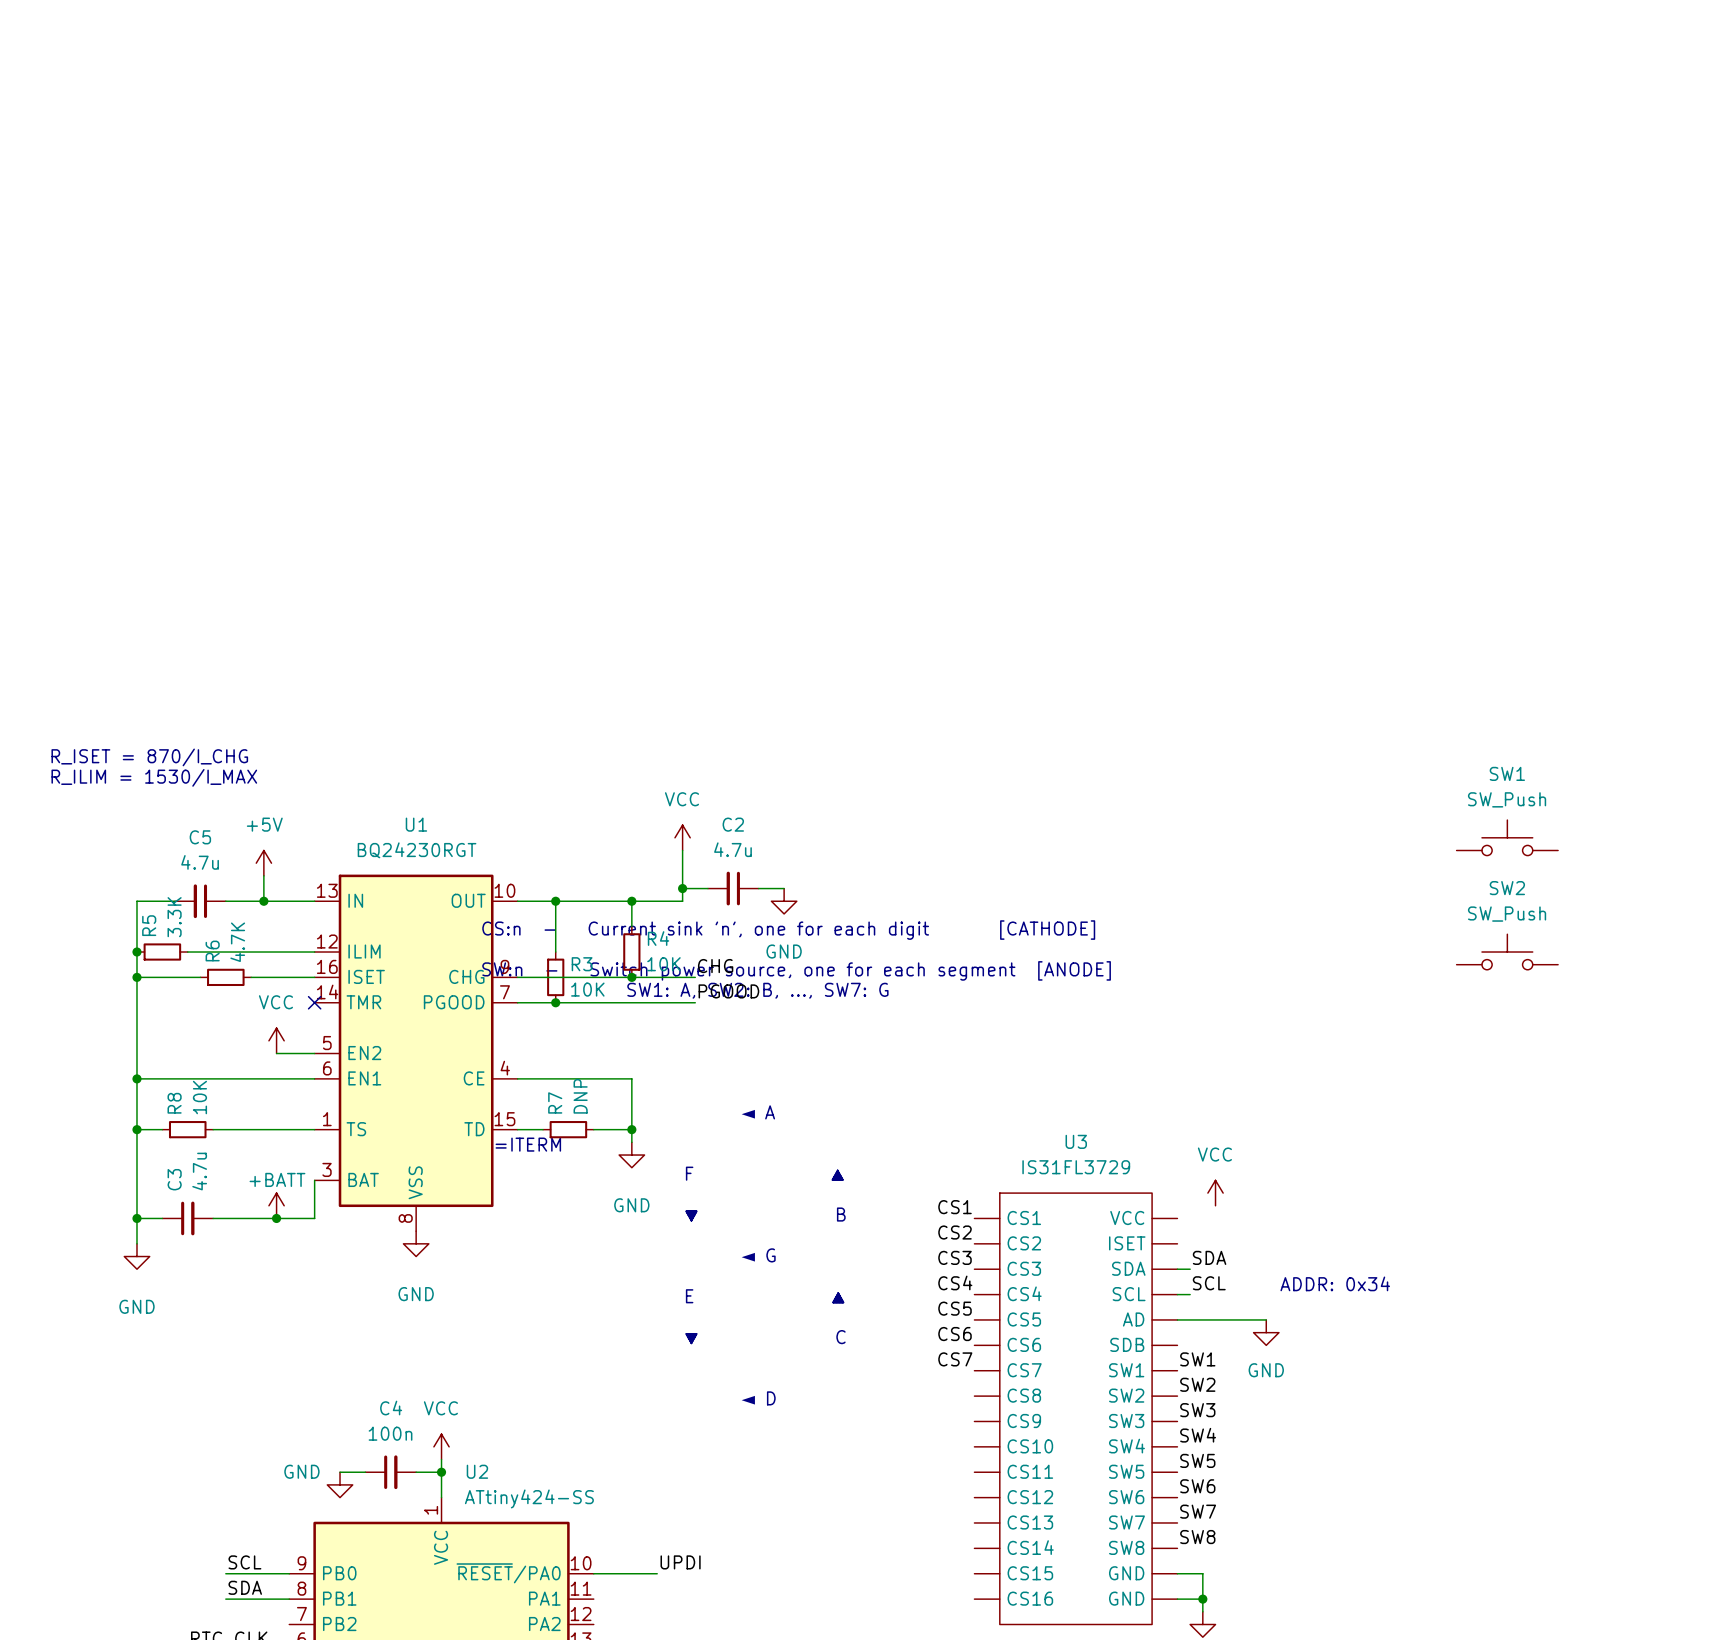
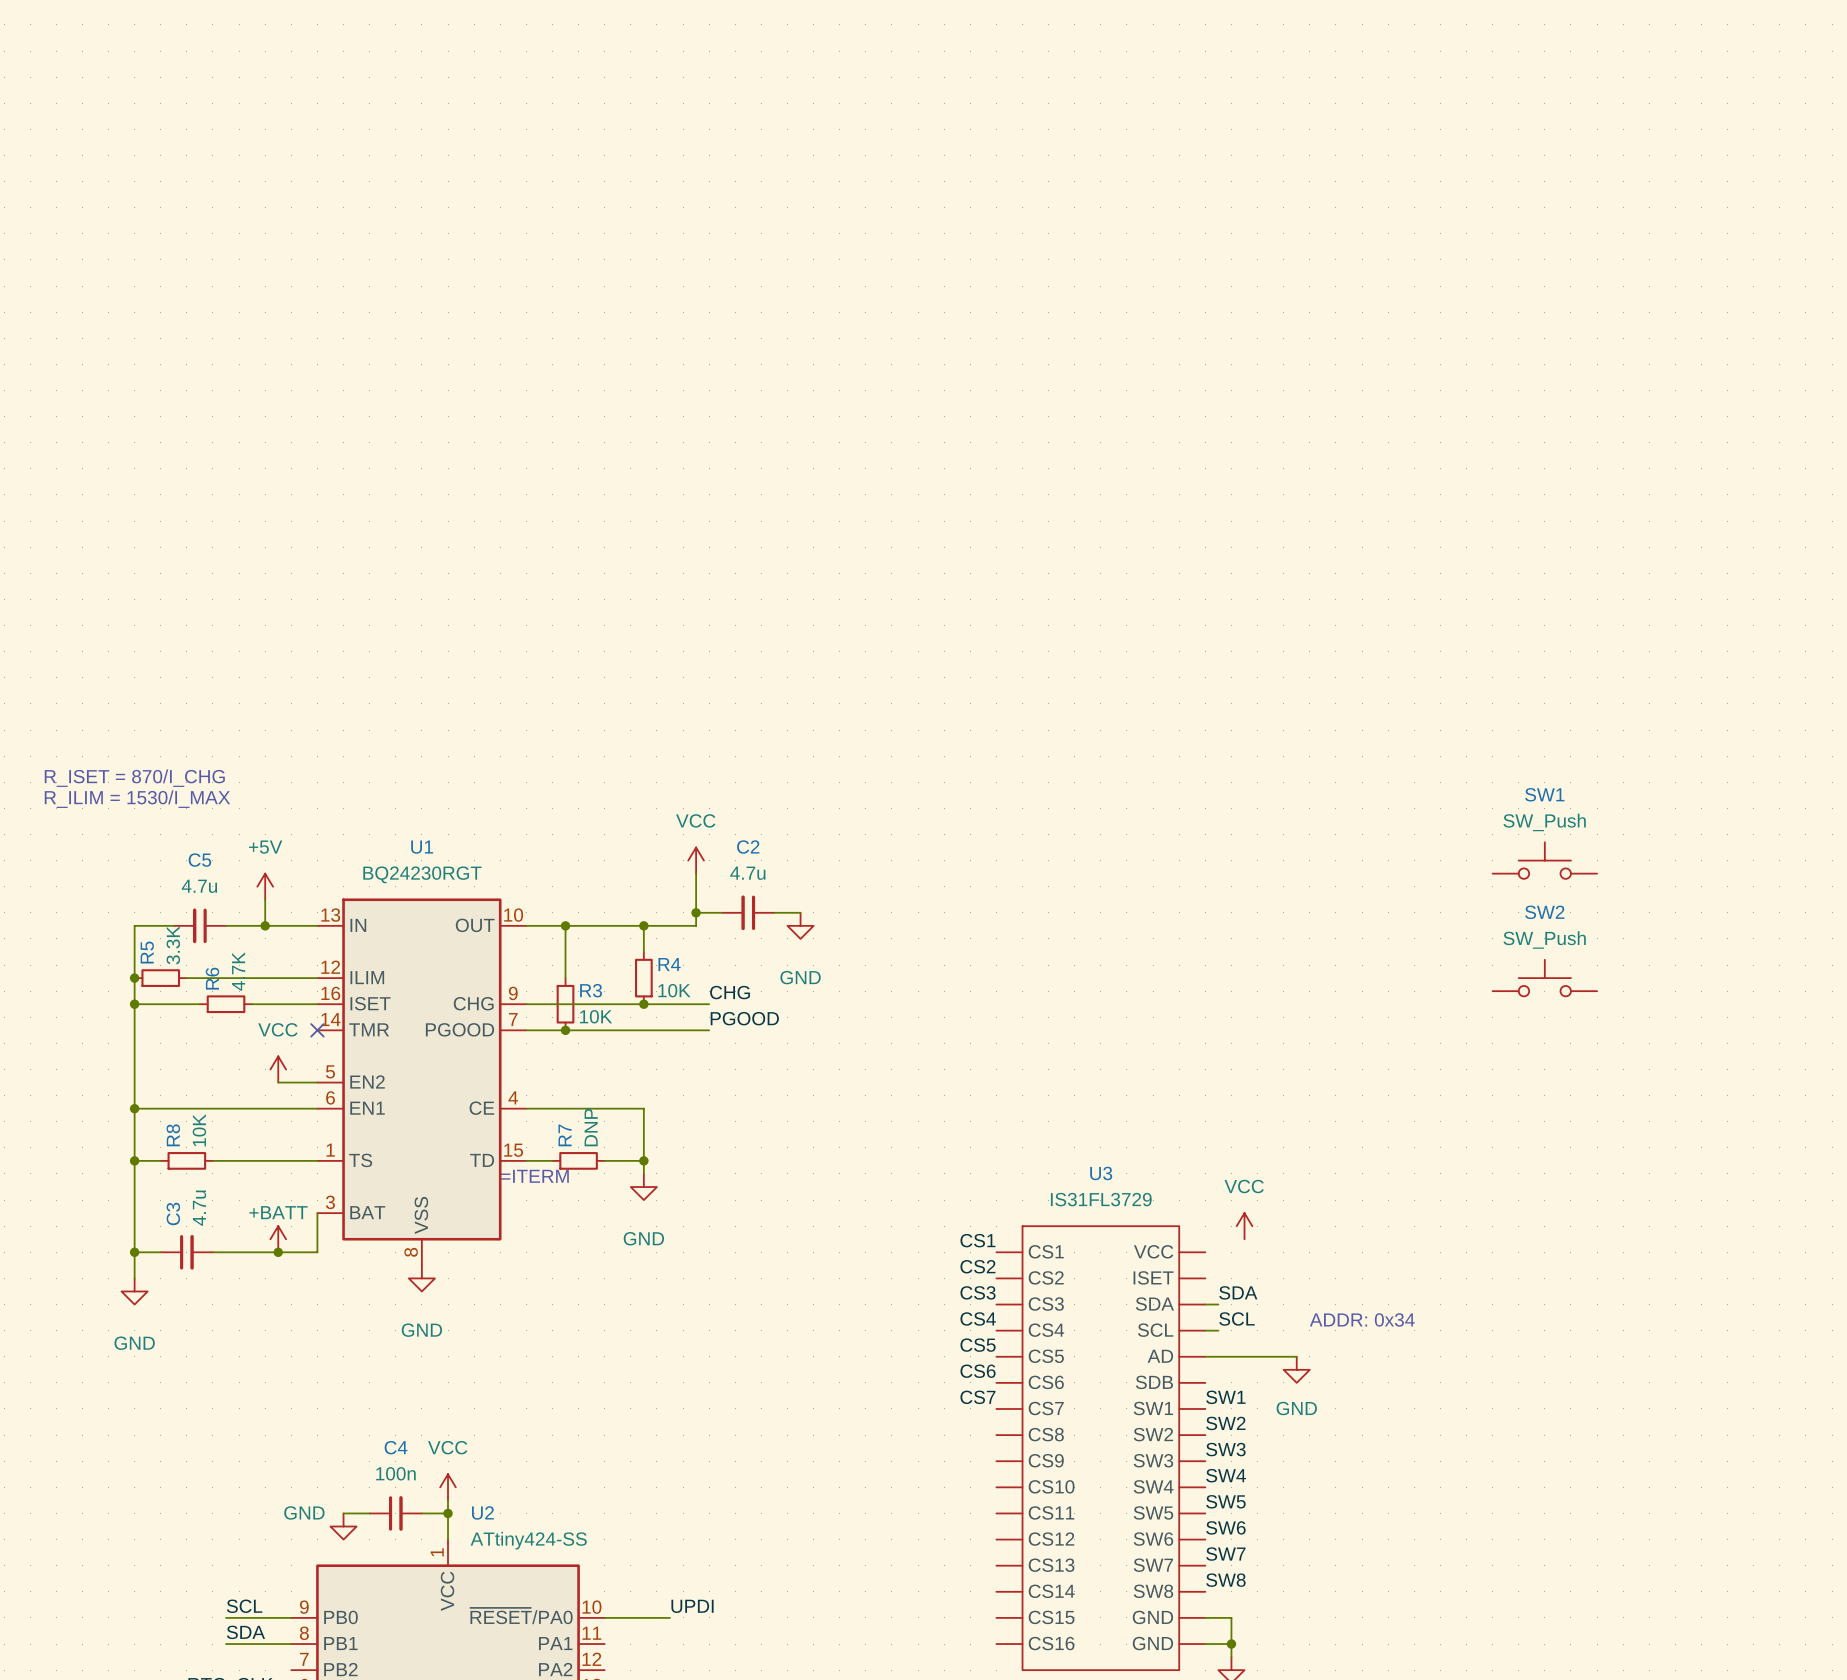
text: CS:n - Current sink 'n', one for each digit [CATHODE] (788, 930) -> none
text: SW:n - Switch power source, one for each segment [ANODE] (796, 970) -> none
text: SW1: A, SW2: B, ..., SW7: G (757, 990) -> none
text: ◄ A (757, 1112) -> none
text: F ▲ (764, 1173) -> none
text: ▼ B (765, 1214) -> none
text: ◄ G (758, 1255) -> none
text: E ▲ (765, 1296) -> none
text: ▼ C (765, 1337) -> none
text: ◄ D (758, 1398) -> none

